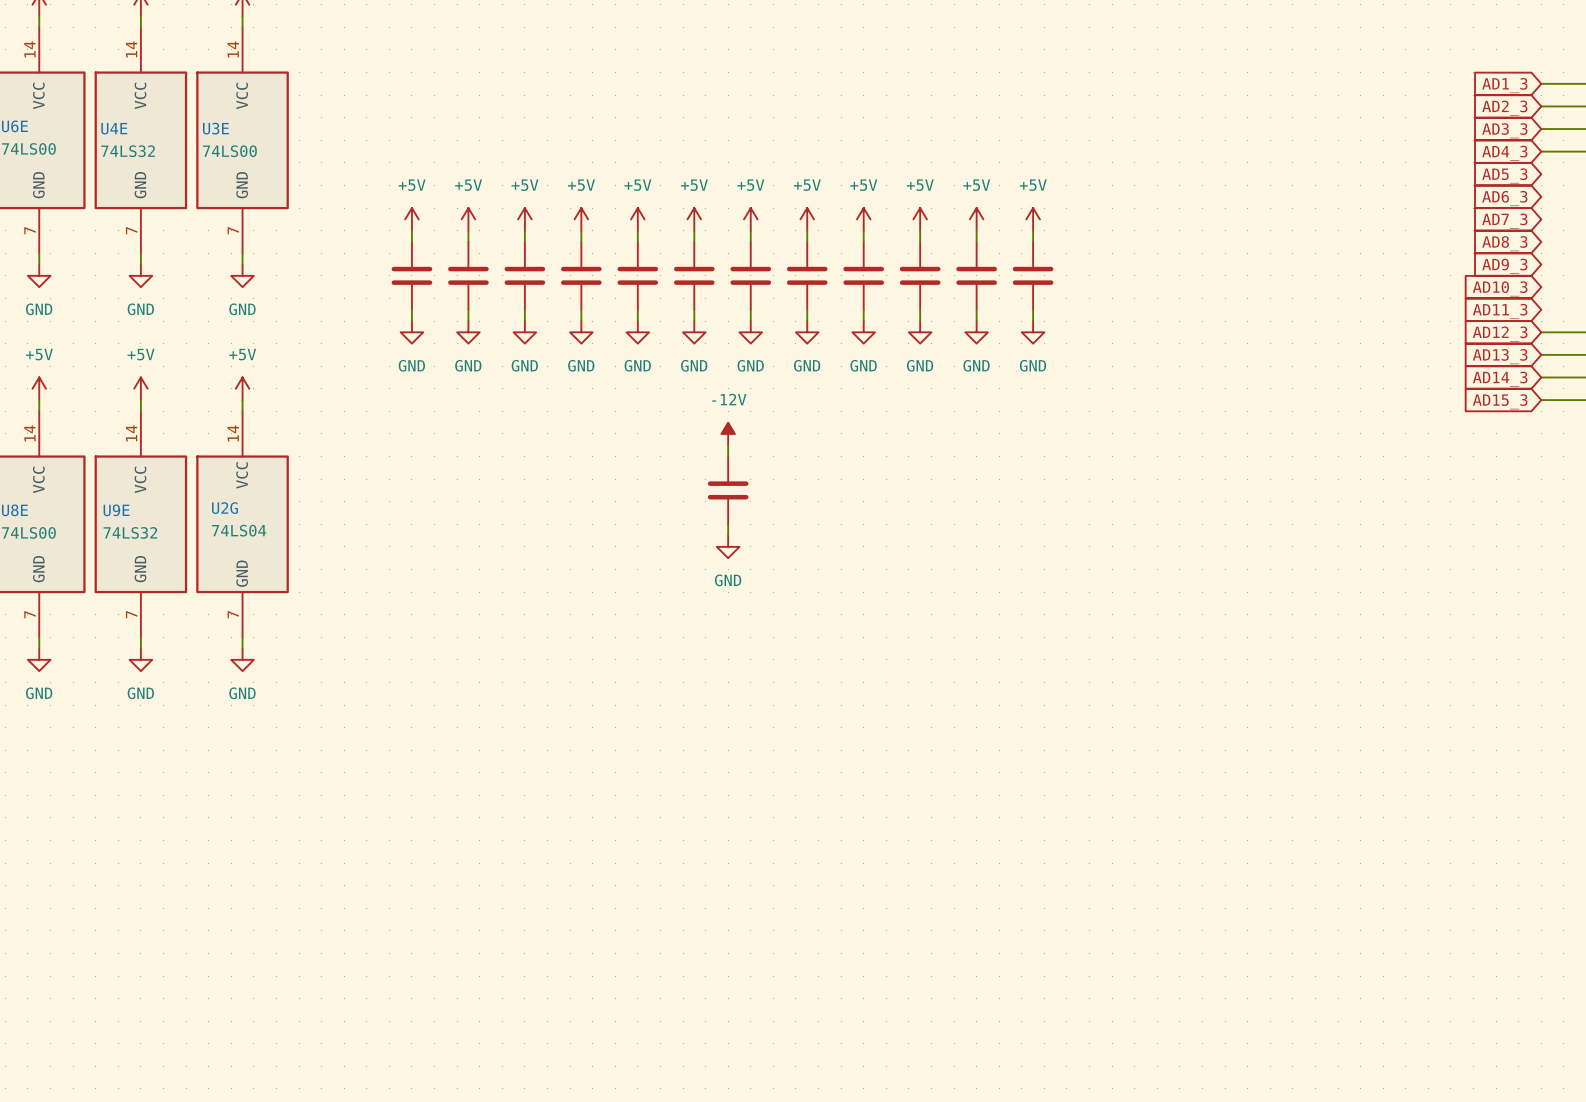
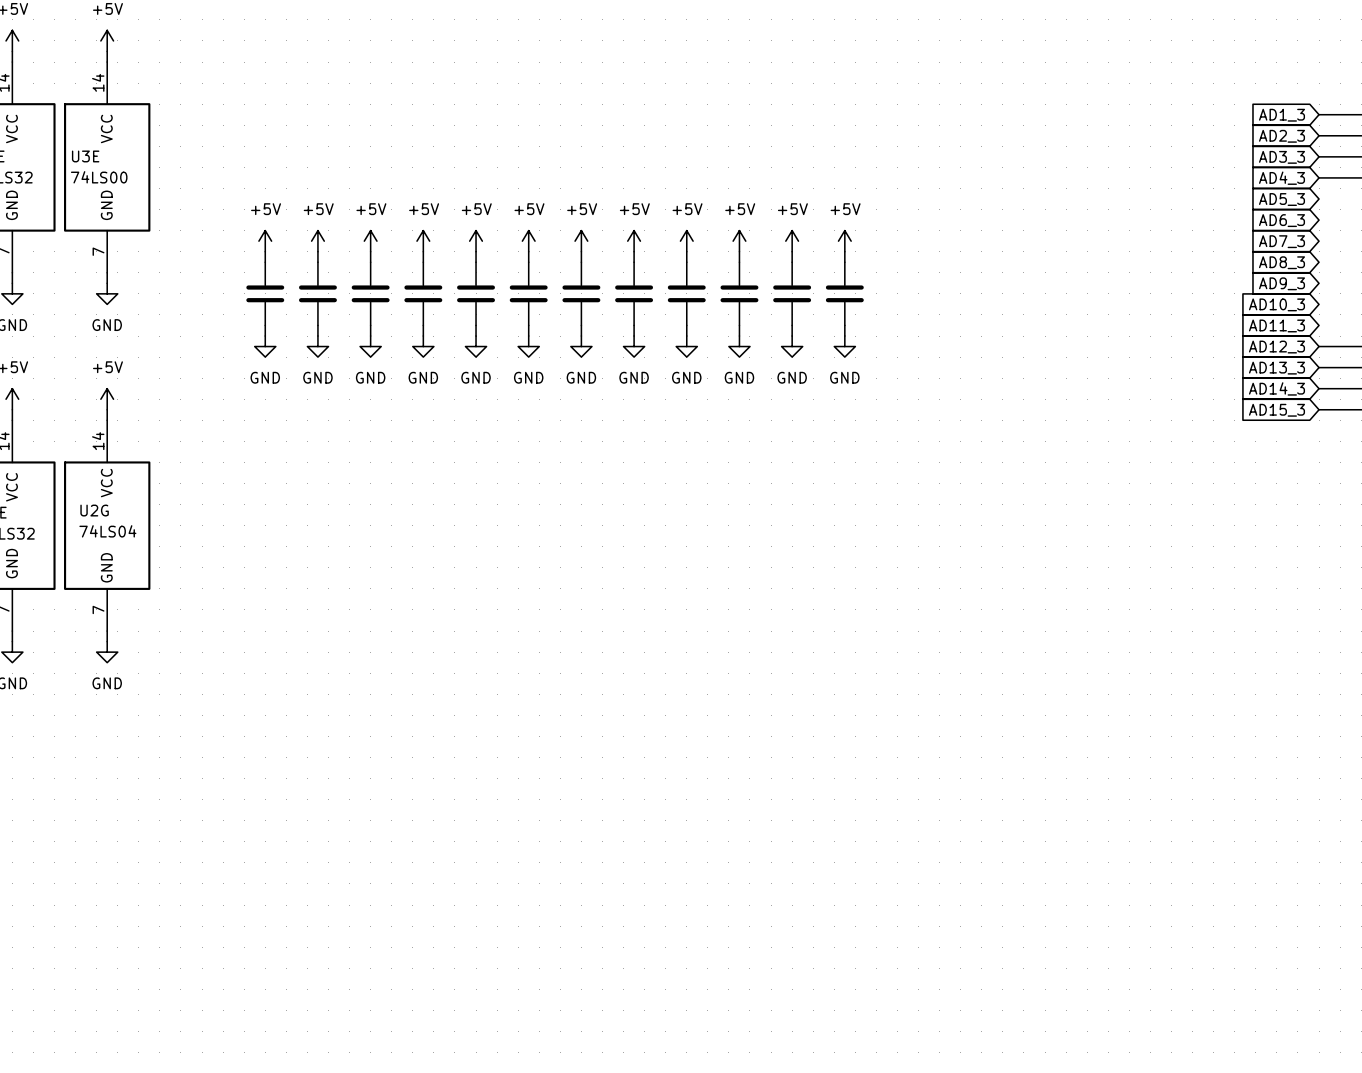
power symbol: -12V (728, 433) -> none
wire: (728, 445) (728, 456) -> none
part: (728, 490) -> none
wire: (728, 524) (728, 535) -> none
power symbol: GND (728, 546) -> none

